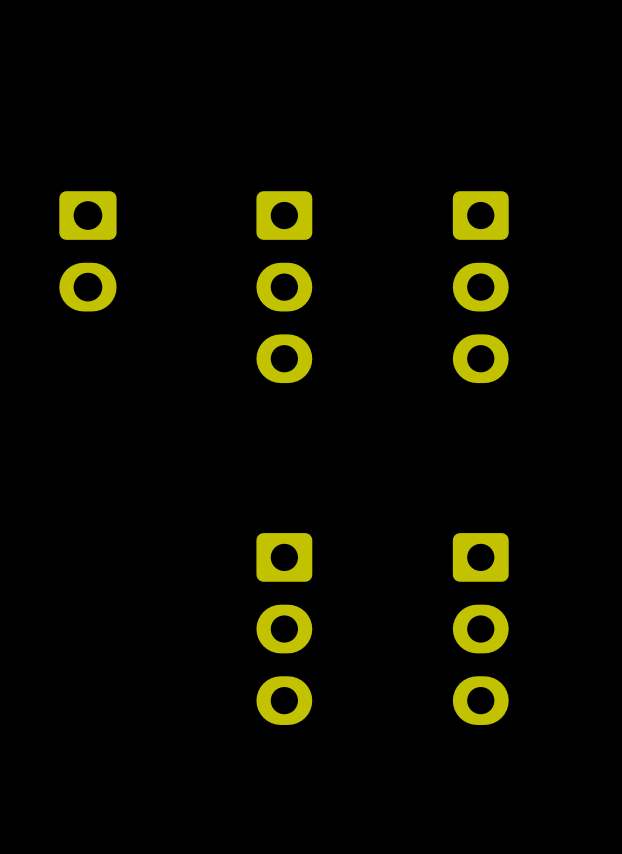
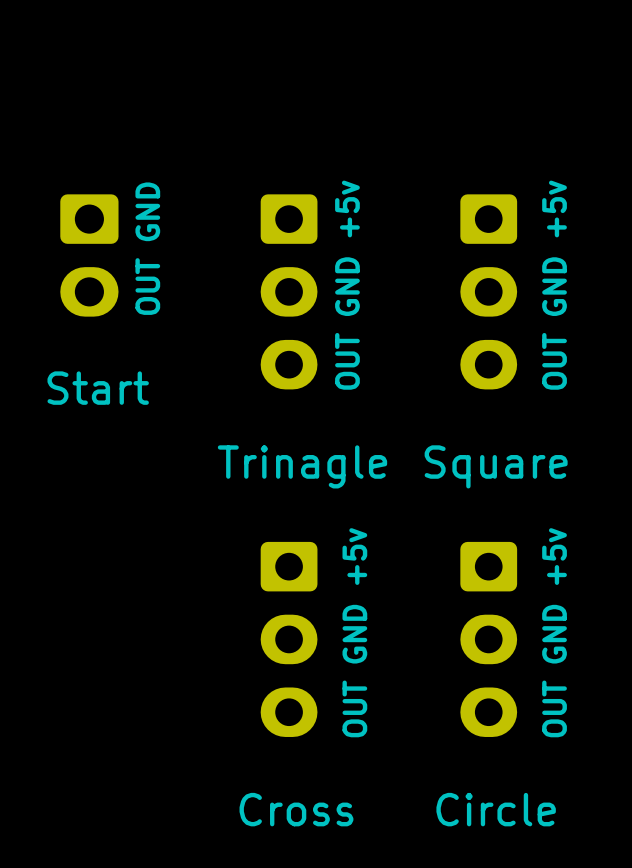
text: none -> OUT GND (147, 248)
text: none -> OUT GND +5v (347, 285)
text: none -> OUT GND +5v (554, 285)
text: none -> Start (98, 388)
text: none -> Trinagle (302, 466)
text: none -> Square (496, 466)
text: none -> OUT GND +5v (354, 632)
text: none -> OUT GND +5v (554, 632)
text: none -> Cross (296, 809)
text: none -> Circle (496, 809)

